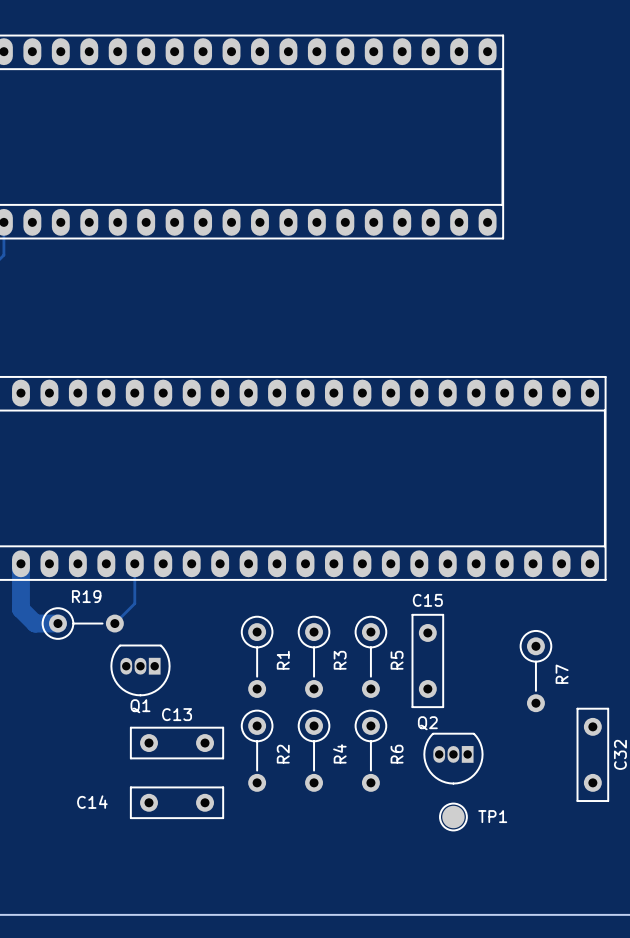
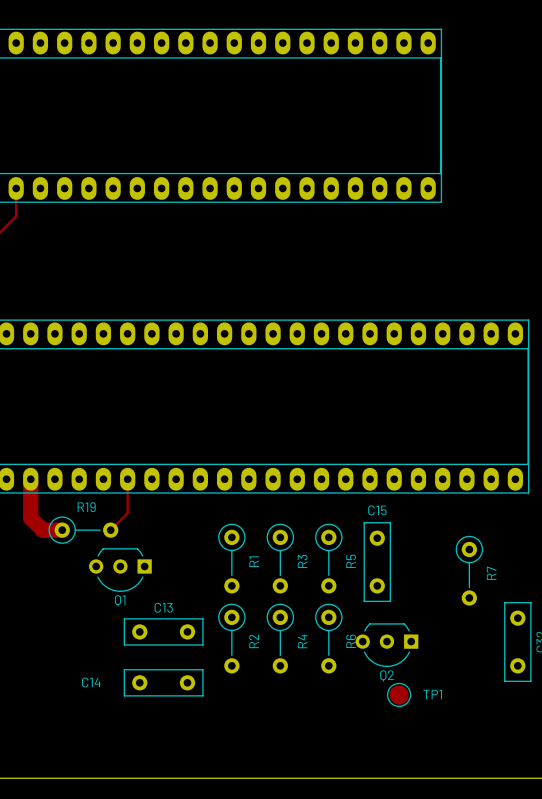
Q1 footprint: [110, 644, 171, 697] -> [89, 548, 152, 592]
Q2 name position: Q2 (427, 723) -> Q2 (386, 675)
Q2 footprint: [423, 733, 484, 785] -> [355, 623, 419, 667]

